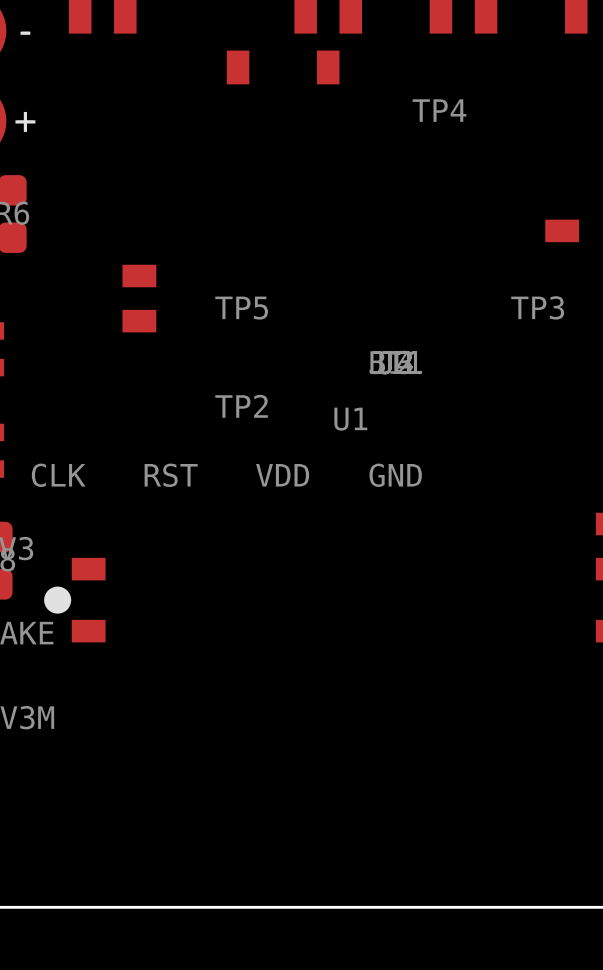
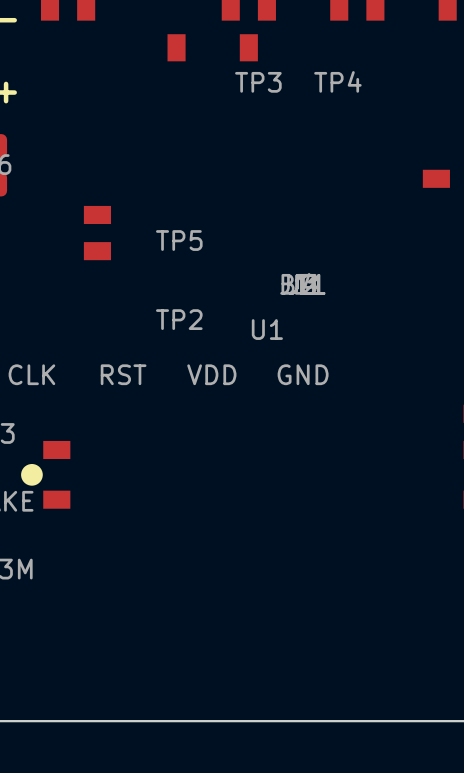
part position: (537, 307) -> (258, 82)

